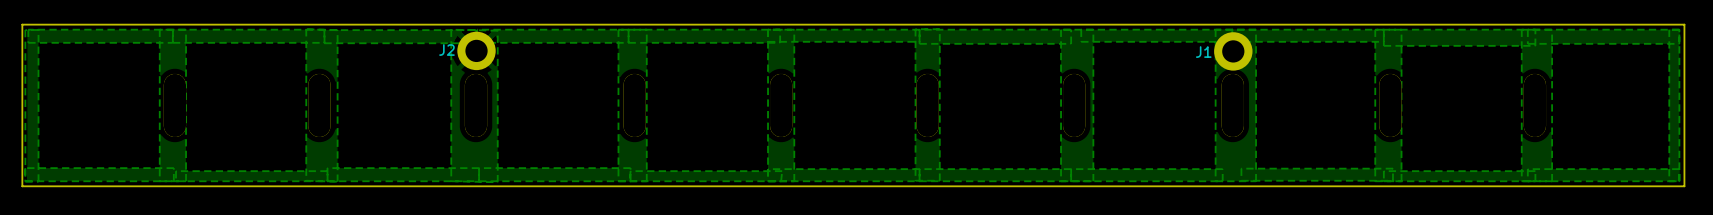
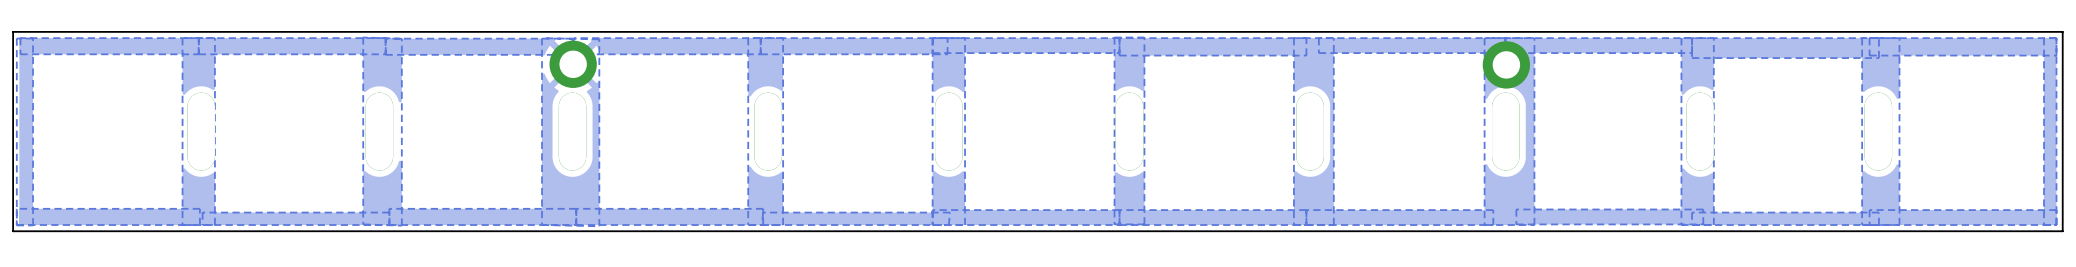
J2 name: J2 (446, 50) -> none
J1 name: J1 (1203, 52) -> none

